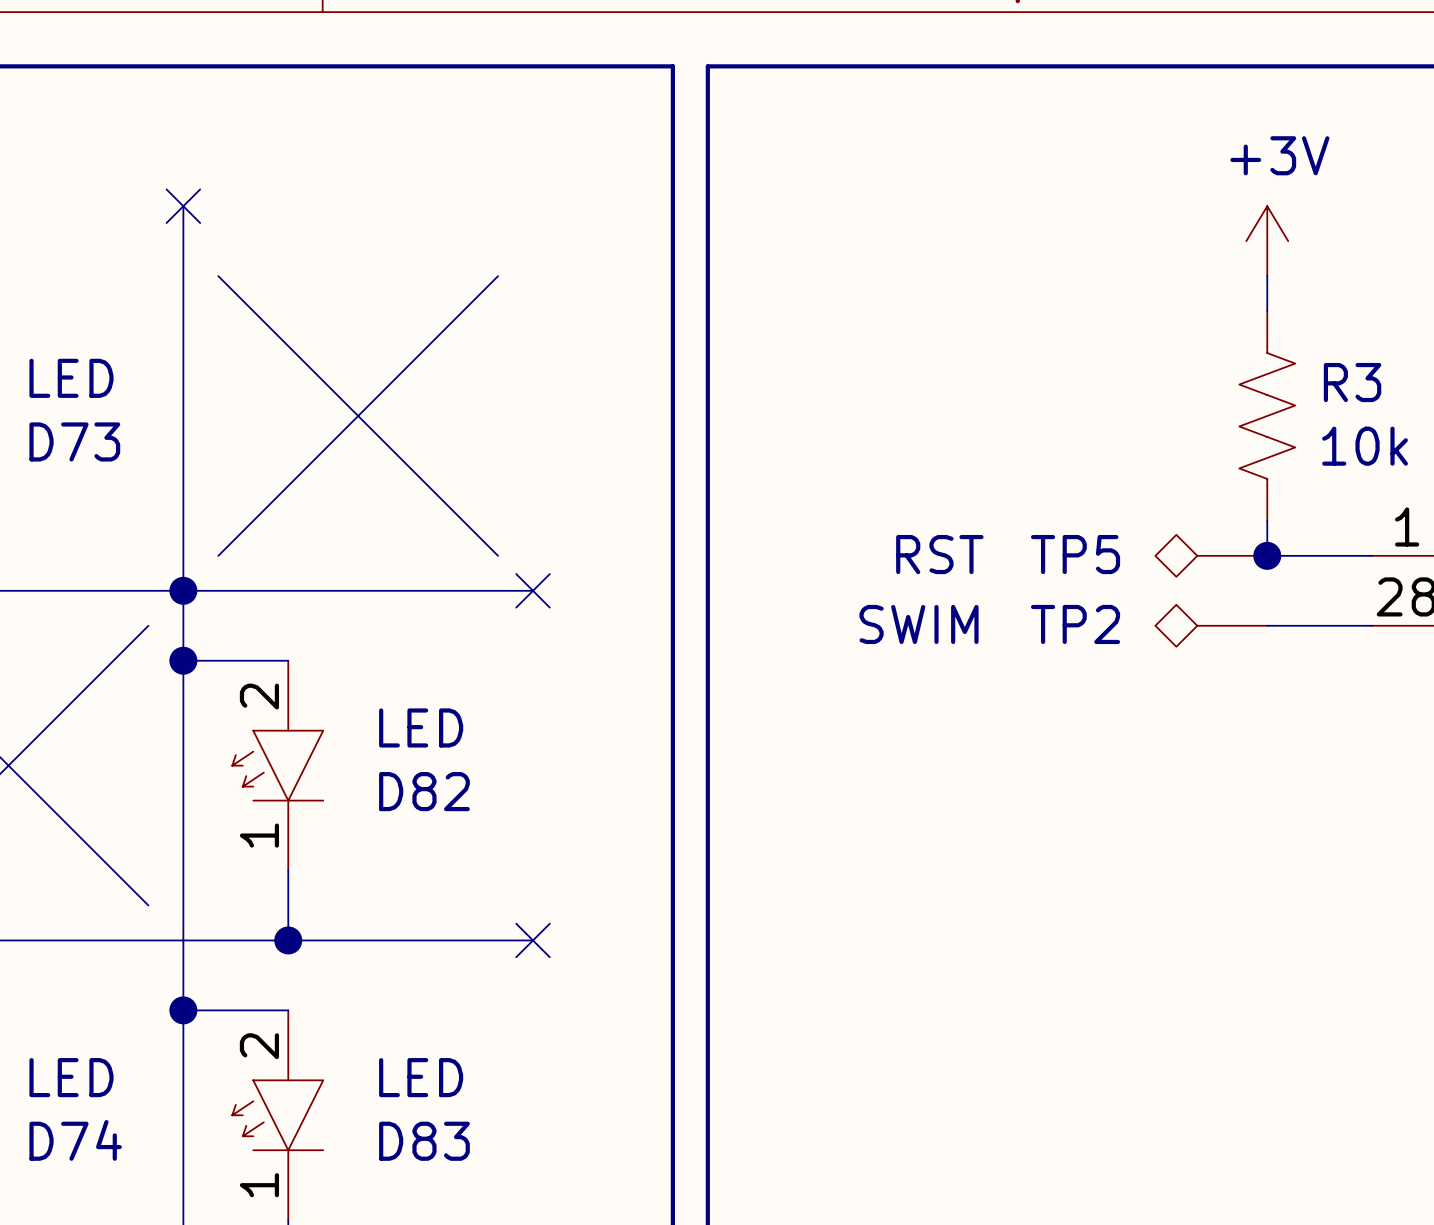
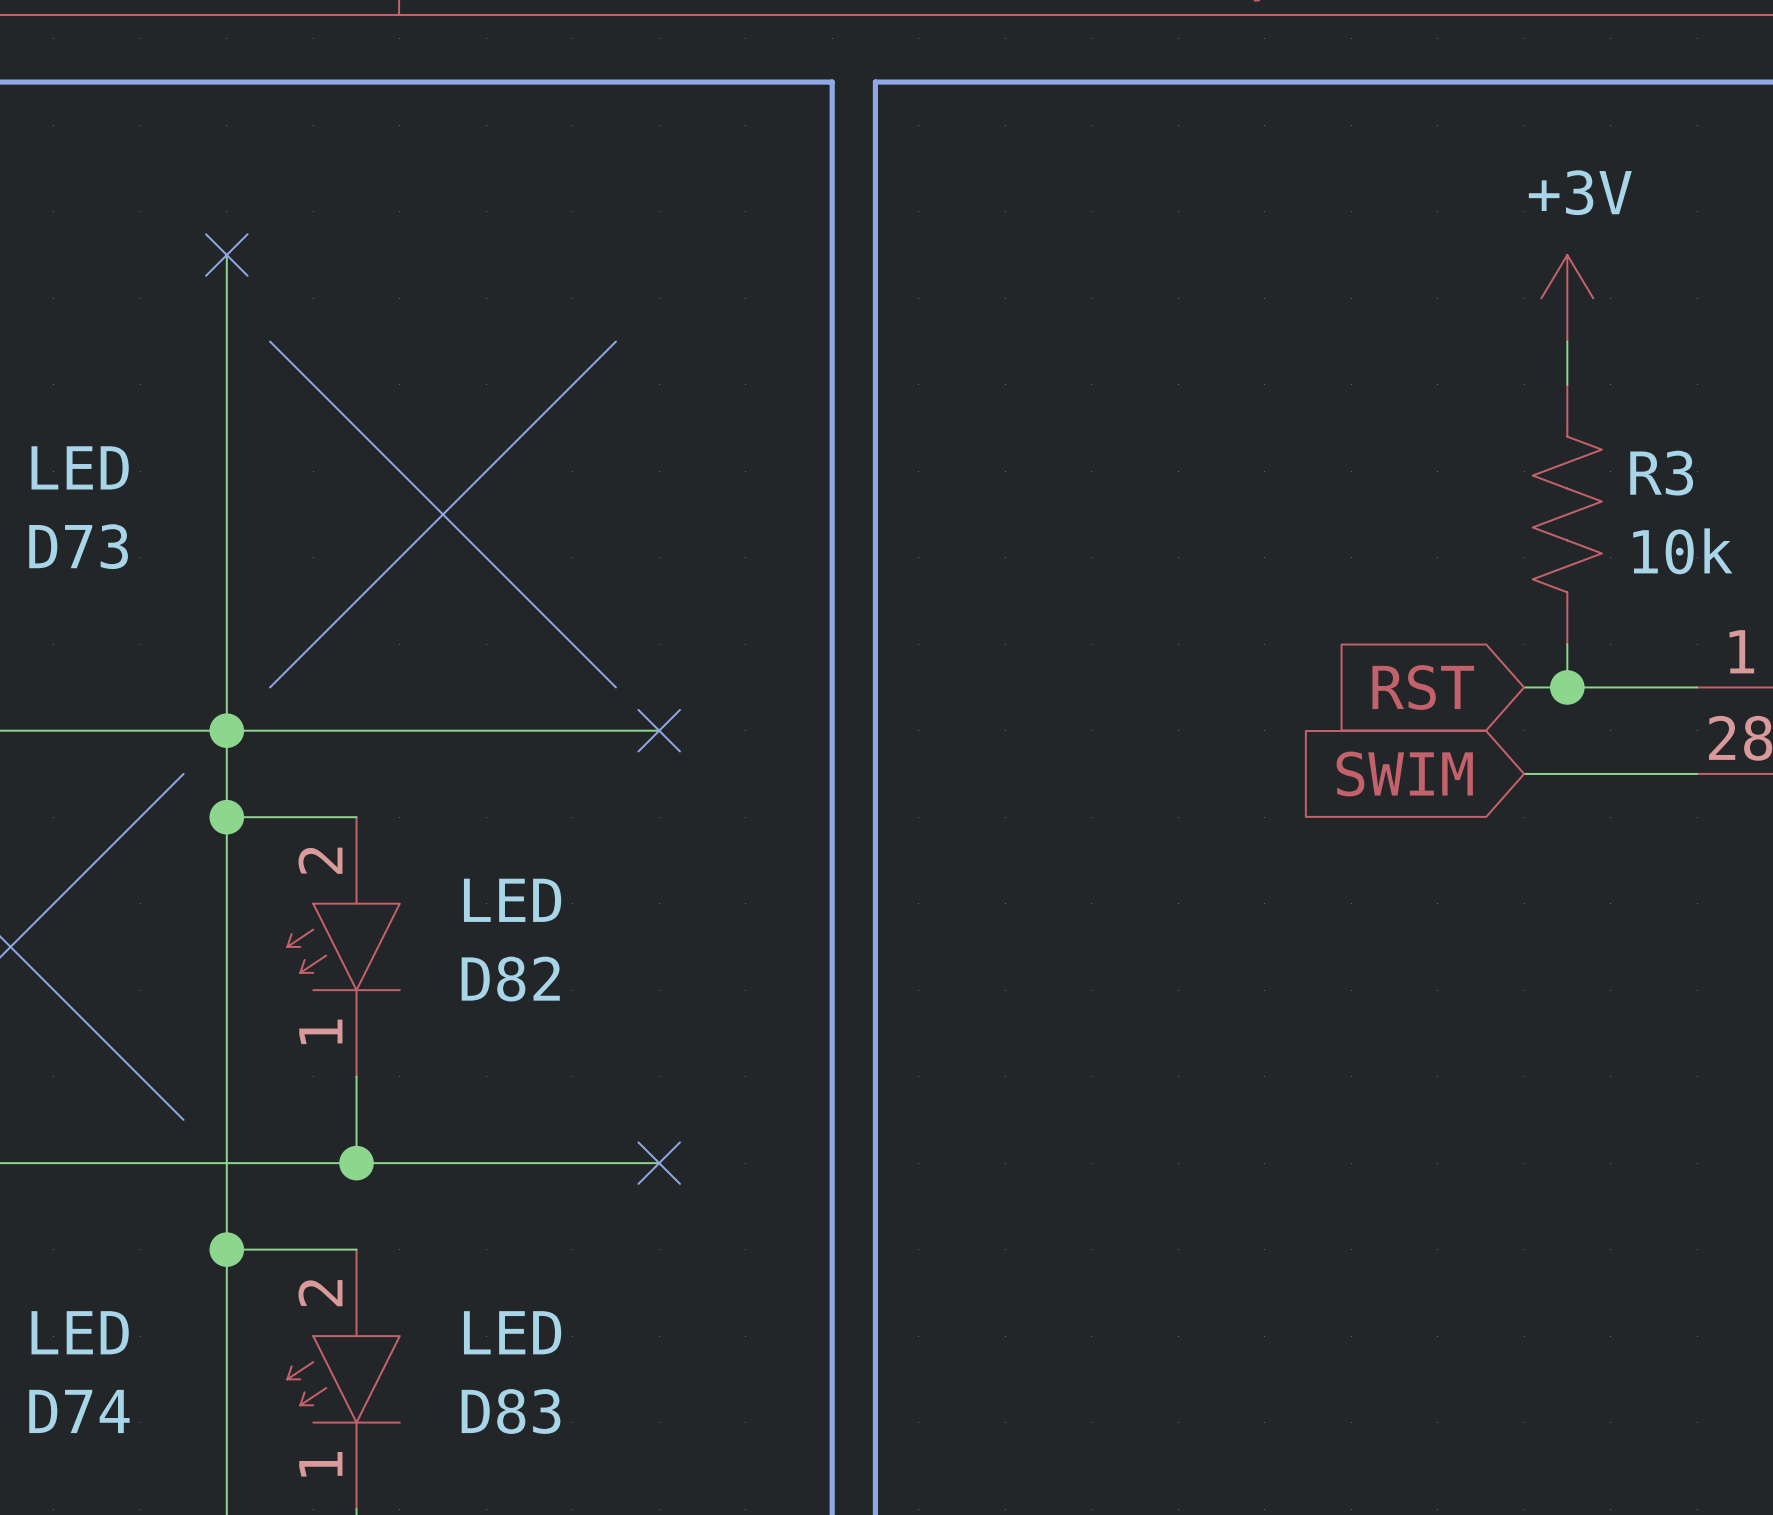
global label: none -> RST (1423, 687)
TP5: RST (1211, 555) -> none
global label: none -> SWIM (1404, 773)
TP2: SWIM (1211, 625) -> none

